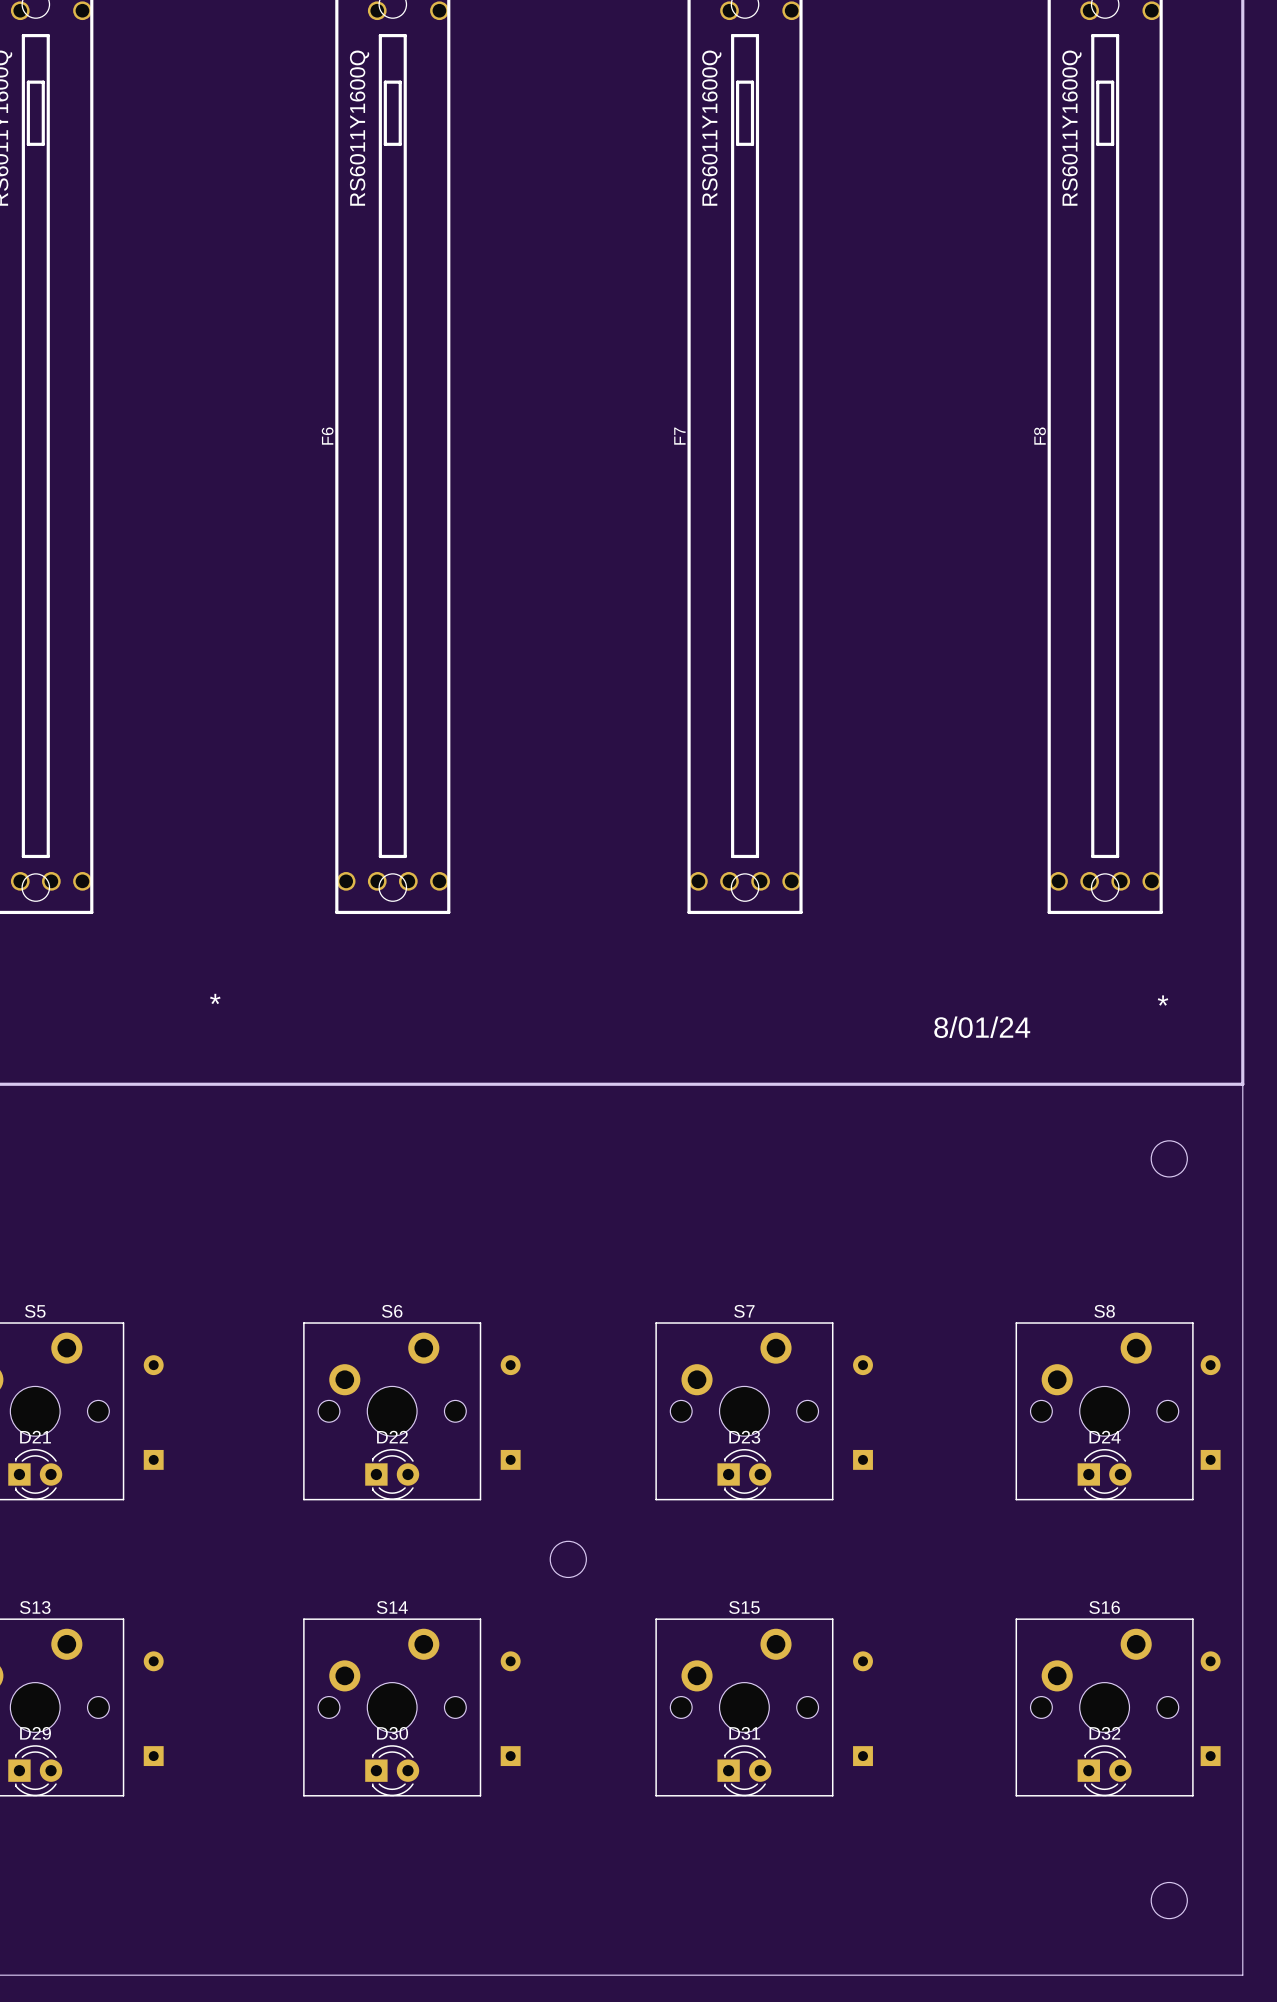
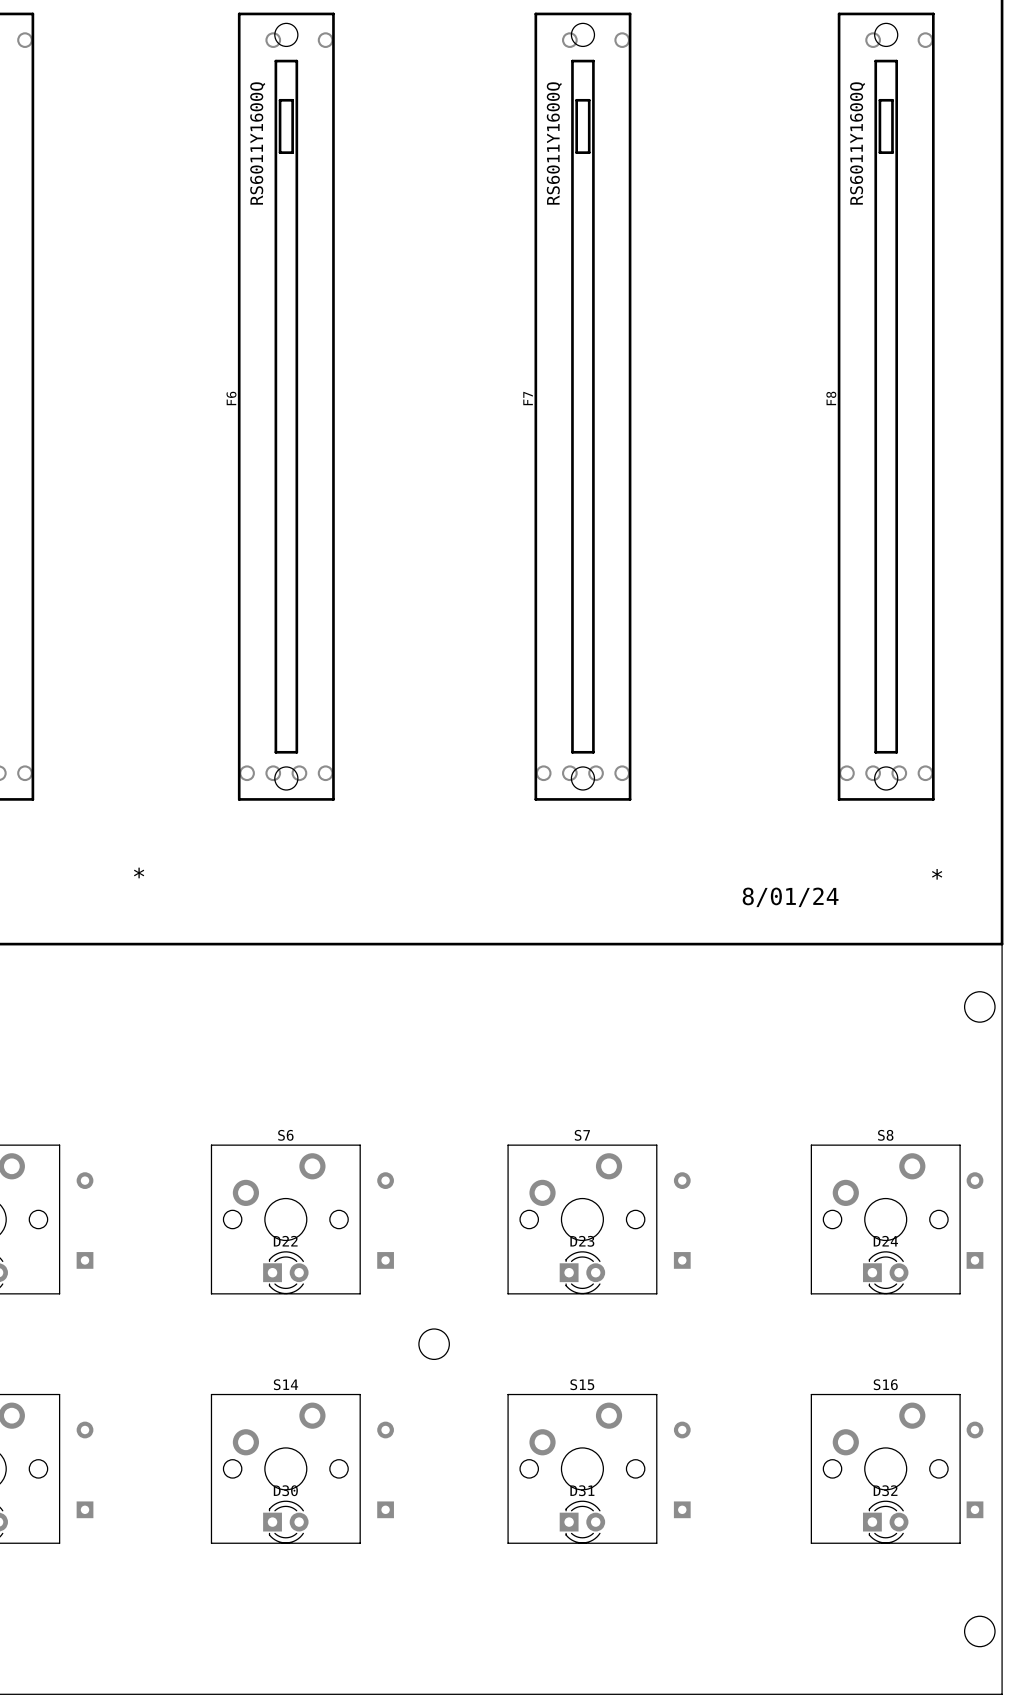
round board edge position: (1169, 1158) -> (979, 1006)
round board edge position: (1169, 1900) -> (979, 1631)

